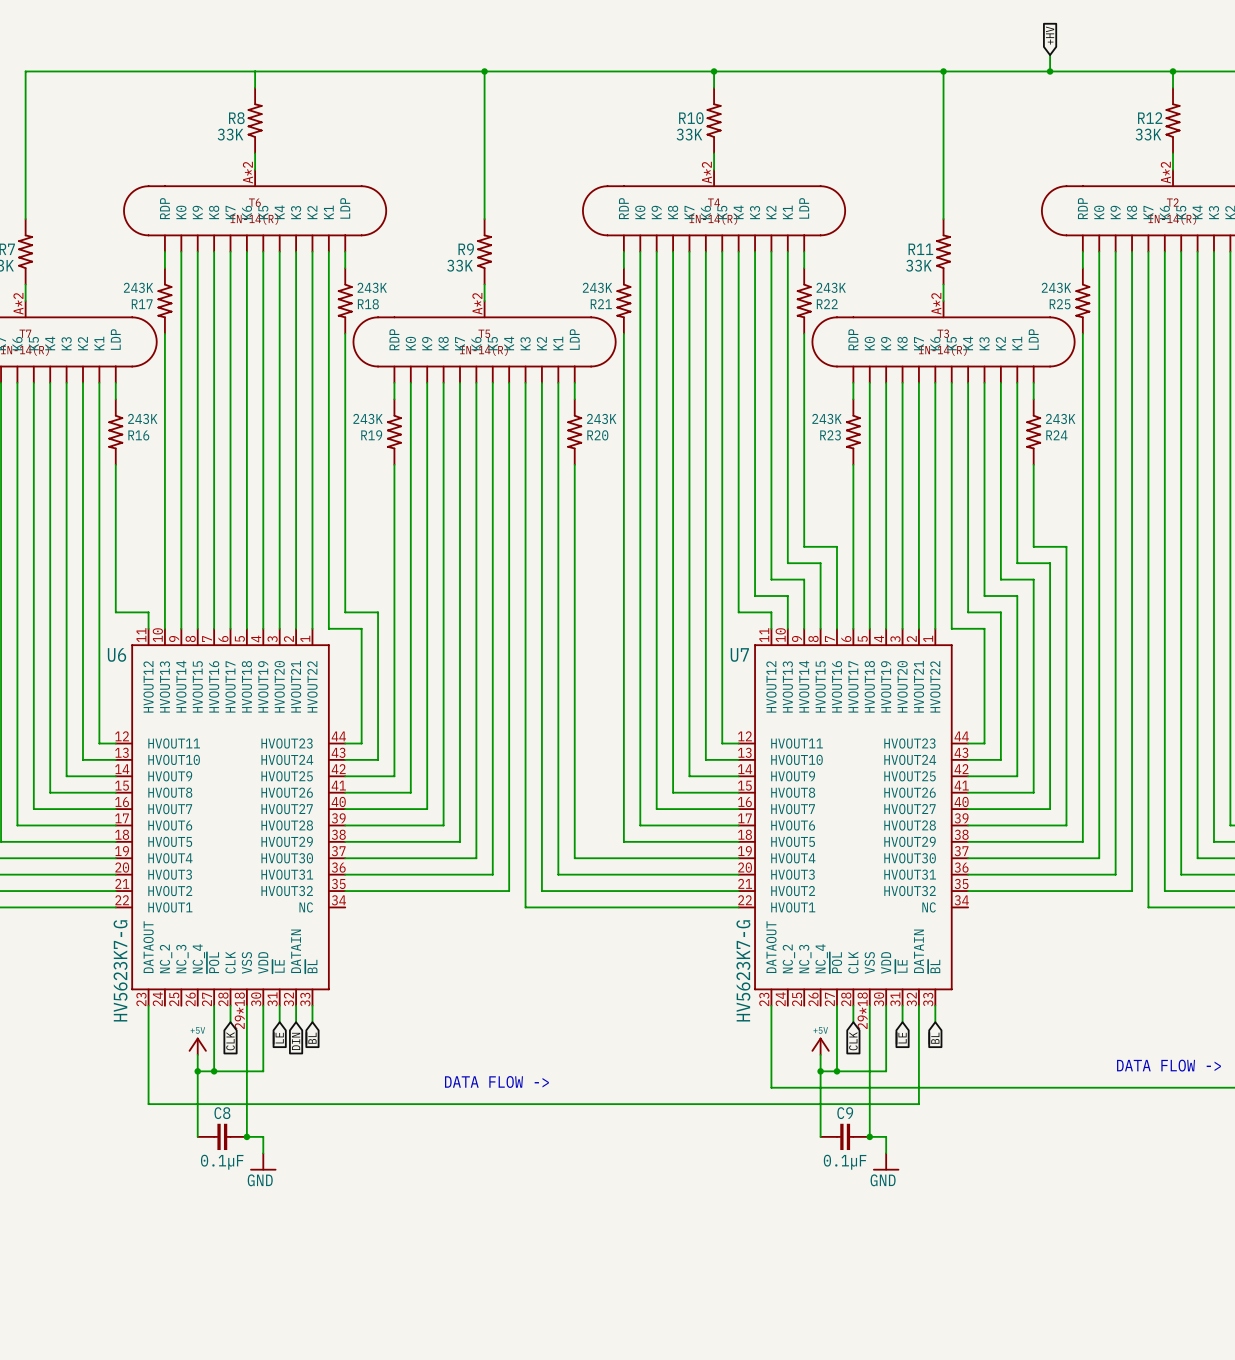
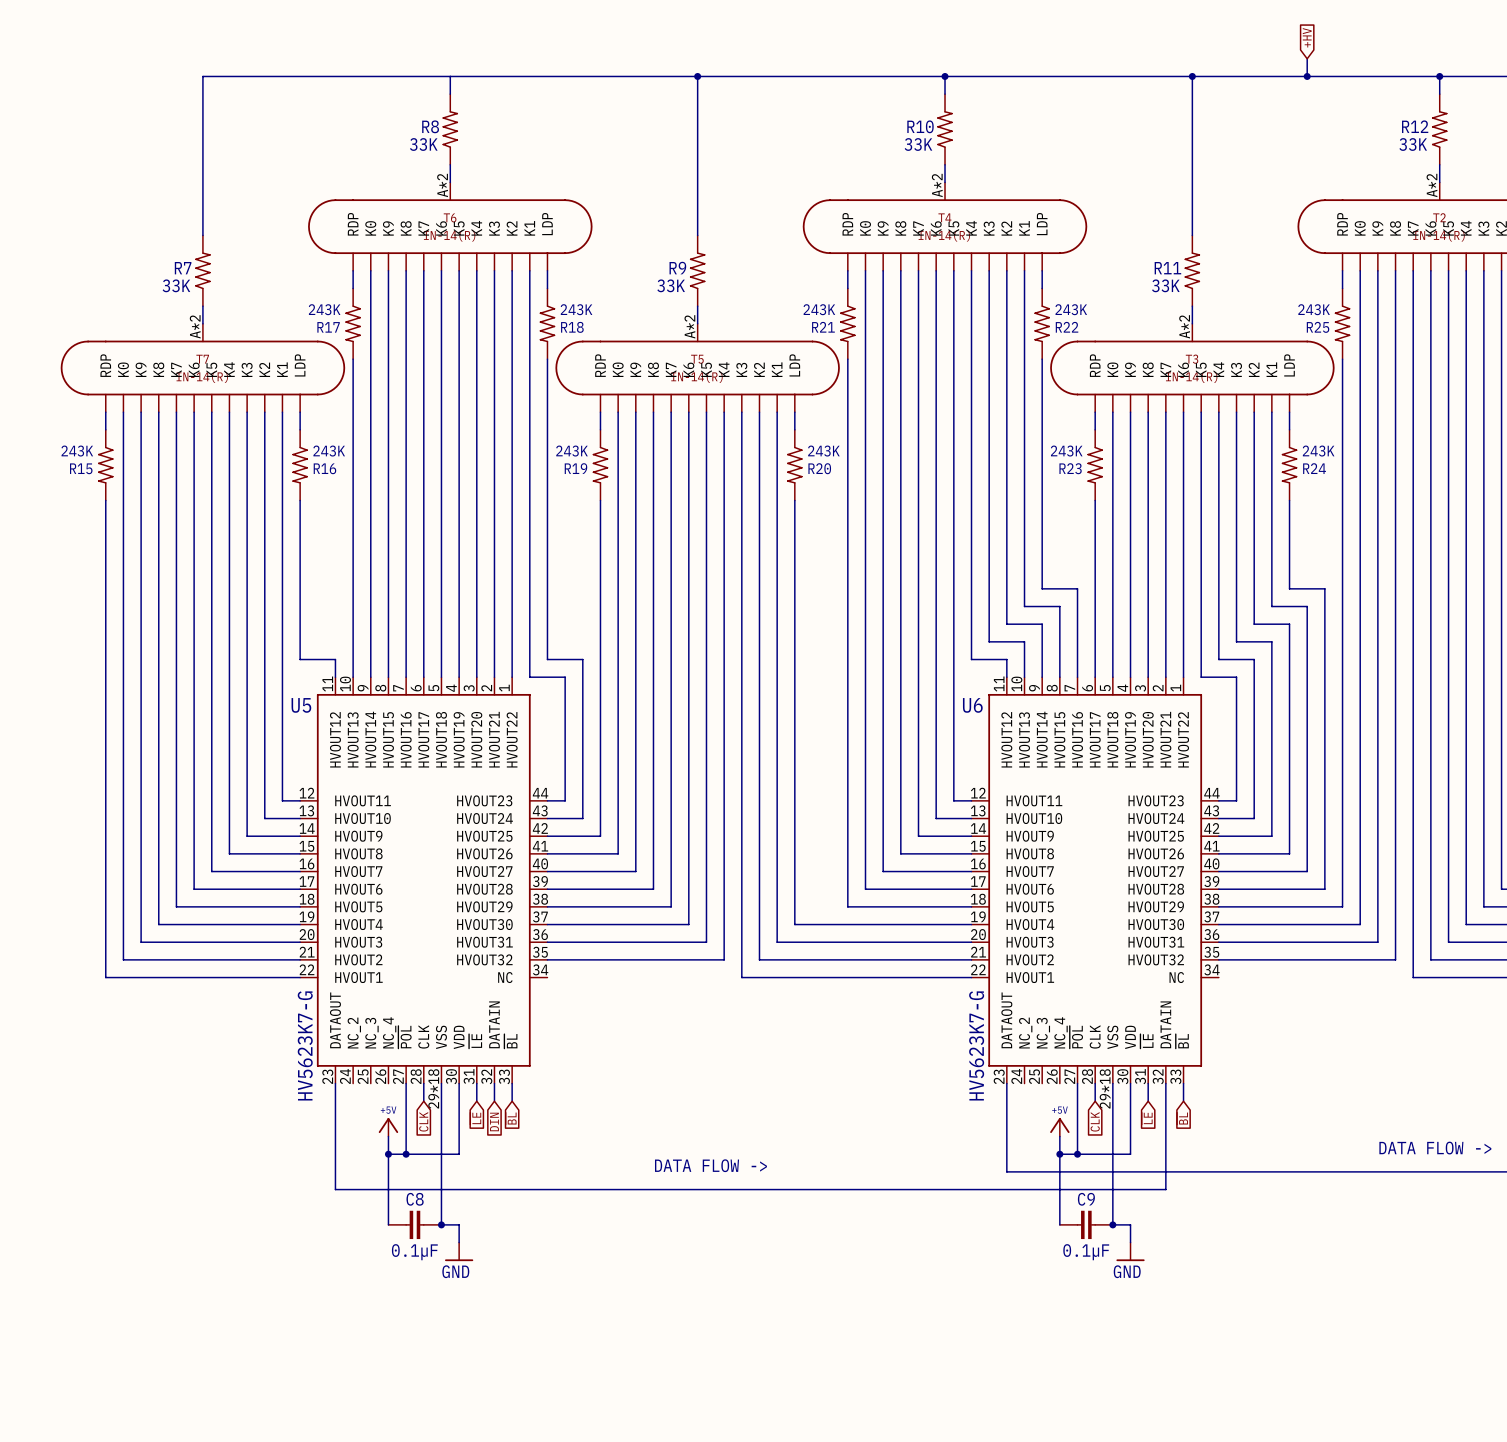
U6 name: U6 (116, 654) -> U5 (301, 705)
U7 name: U7 (739, 654) -> U6 (972, 705)

